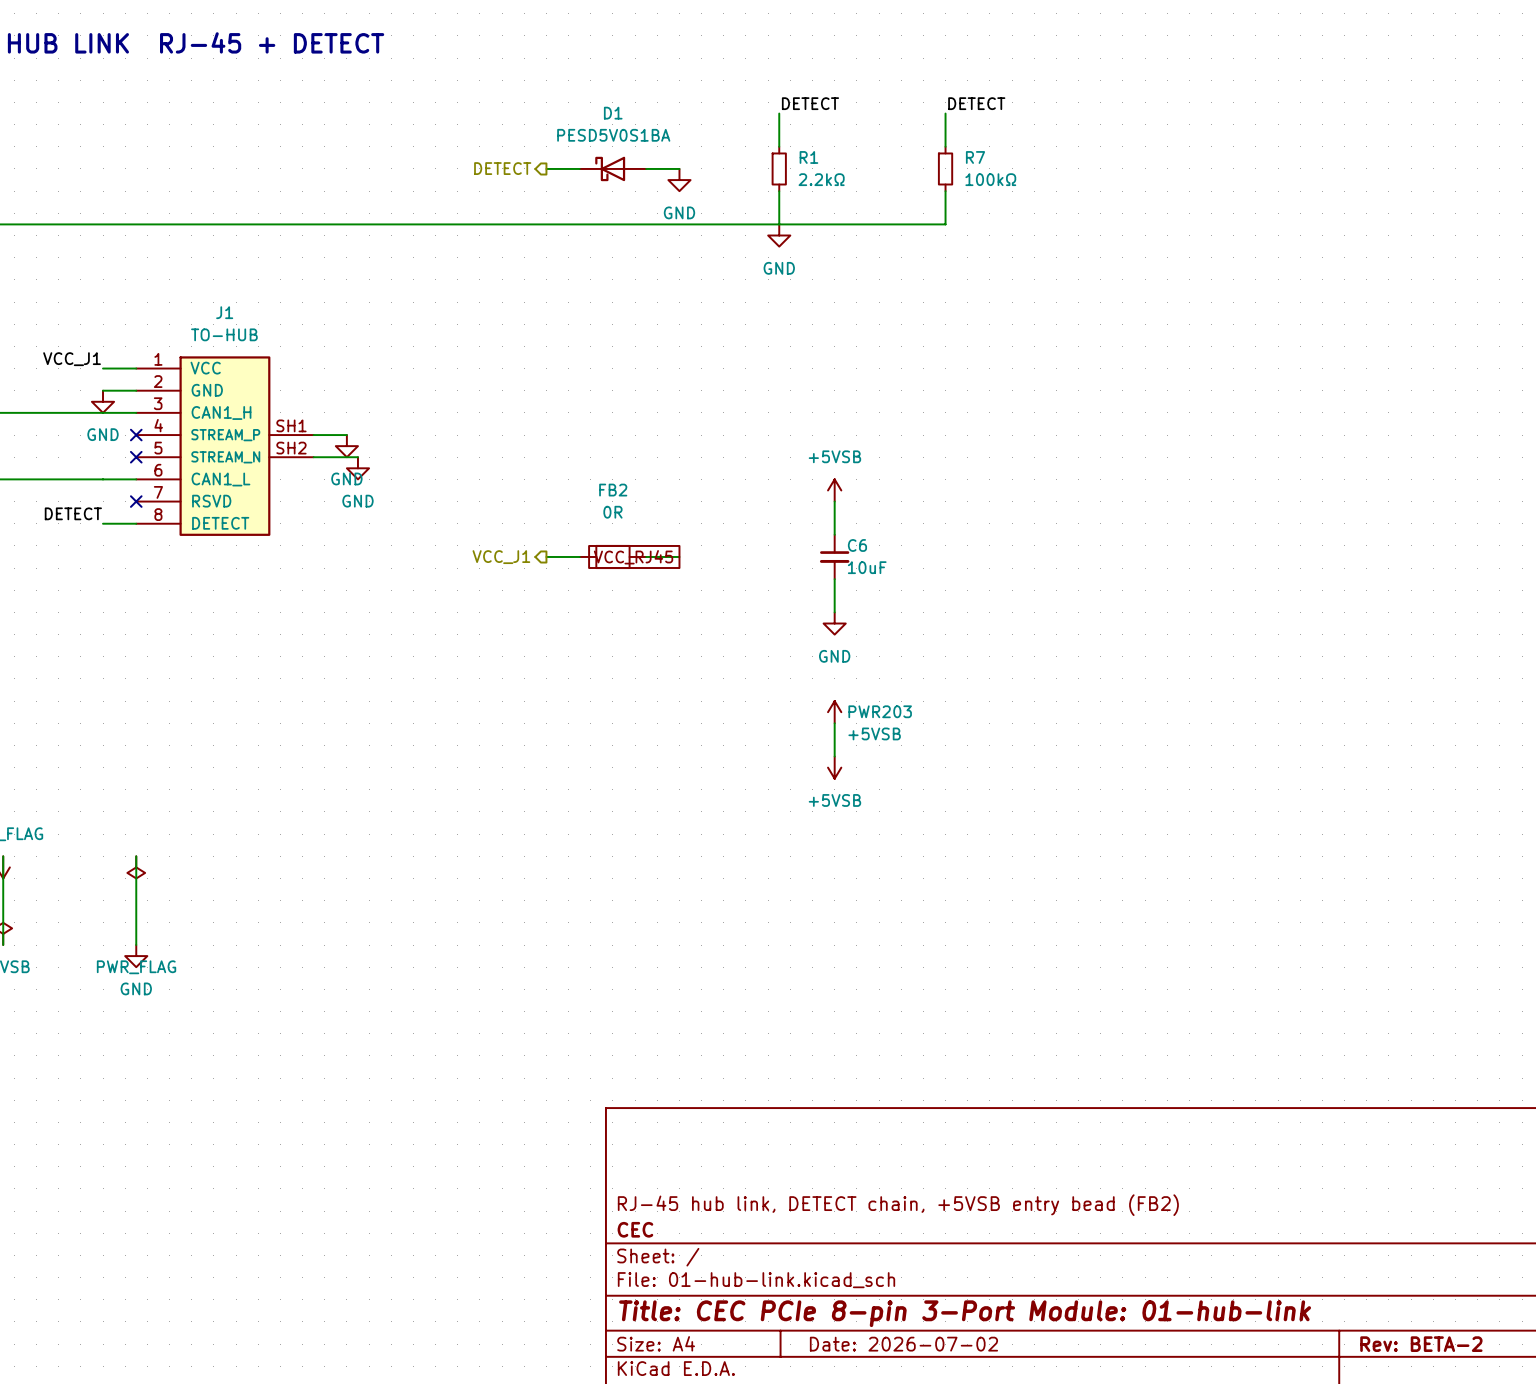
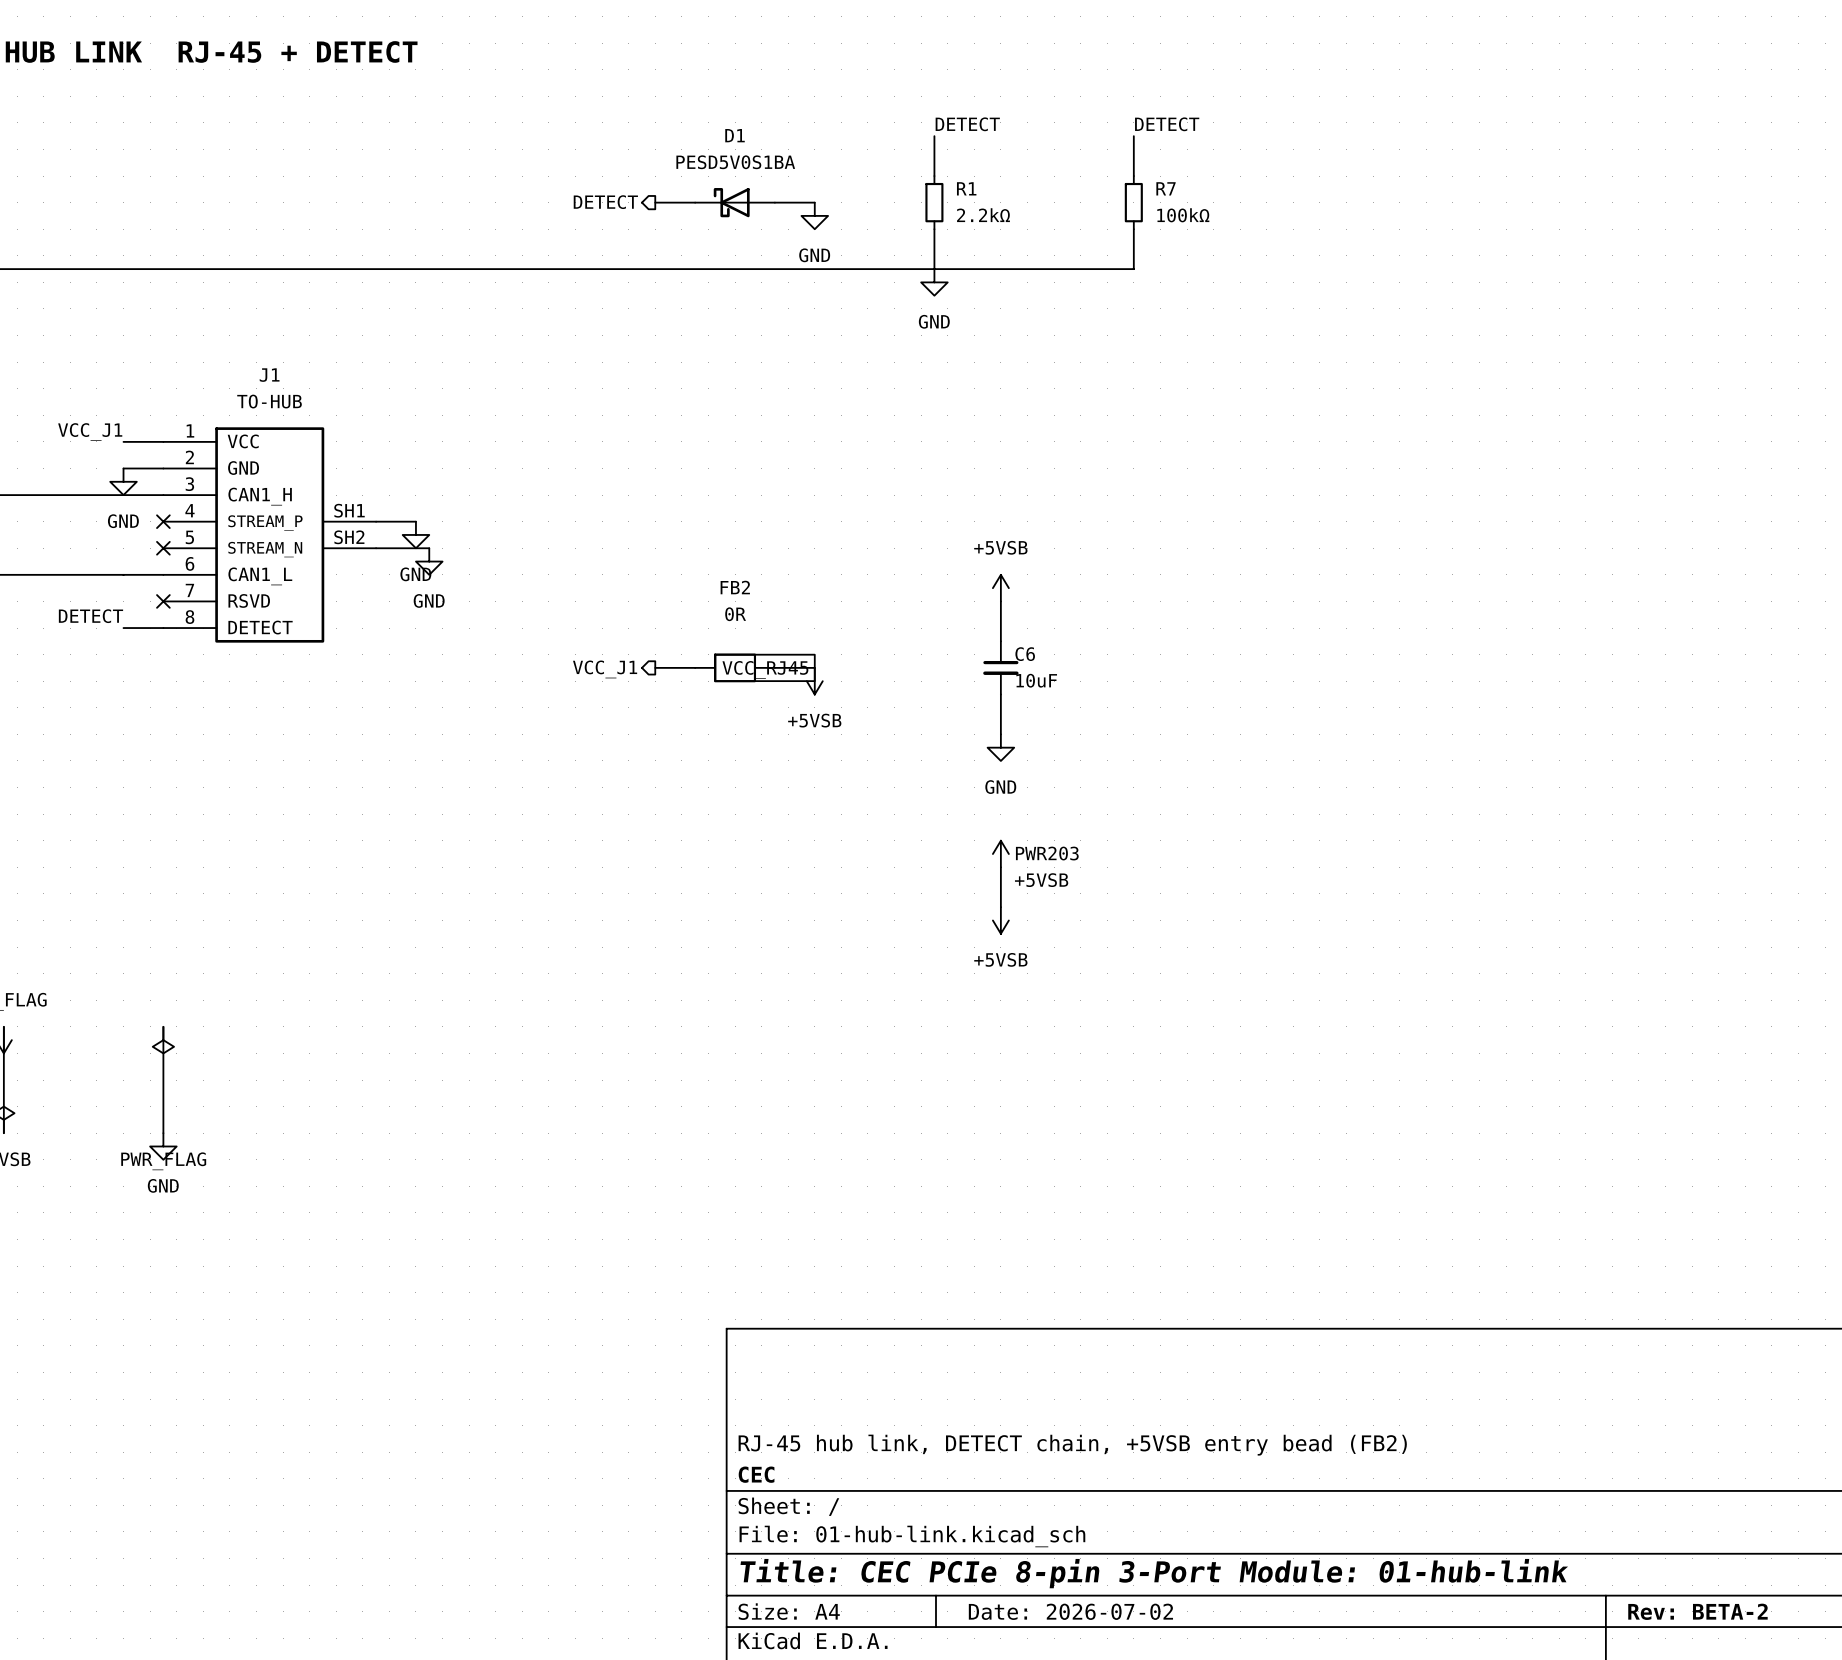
power symbol: none -> +5VSB (814, 681)

